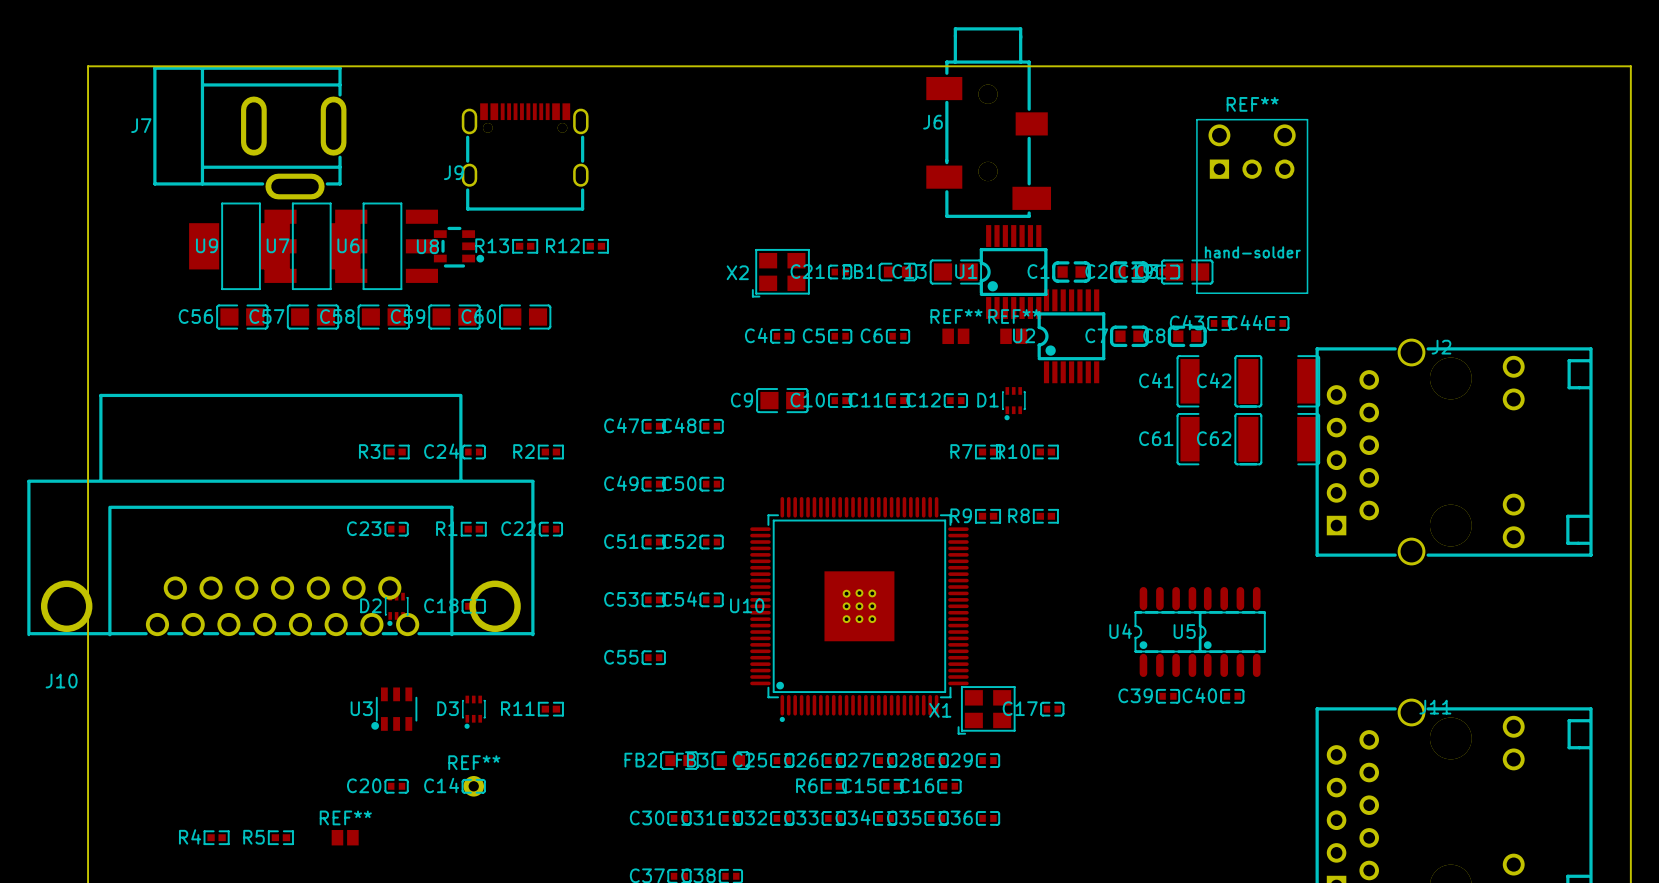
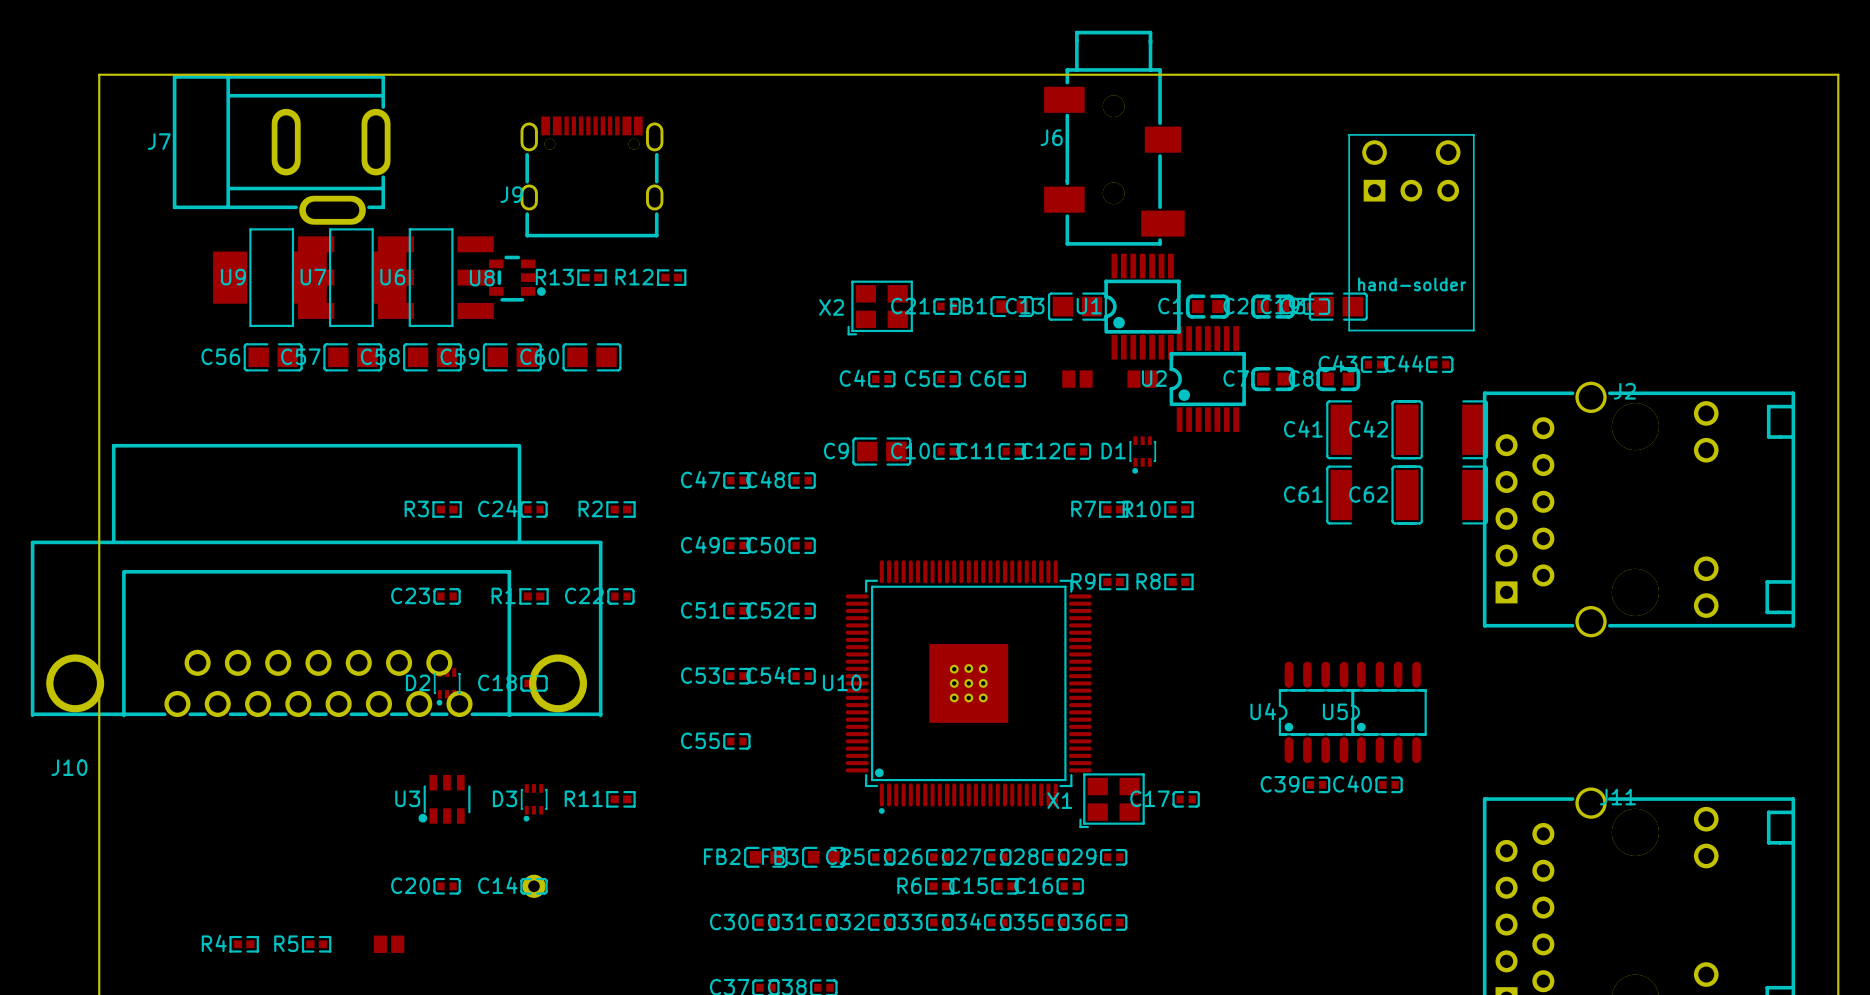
REF** name: REF** (1252, 104) -> none
REF** name: REF** (956, 316) -> none
REF** name: REF** (1014, 316) -> none
REF** name: REF** (474, 762) -> none
REF** name: REF** (345, 817) -> none

